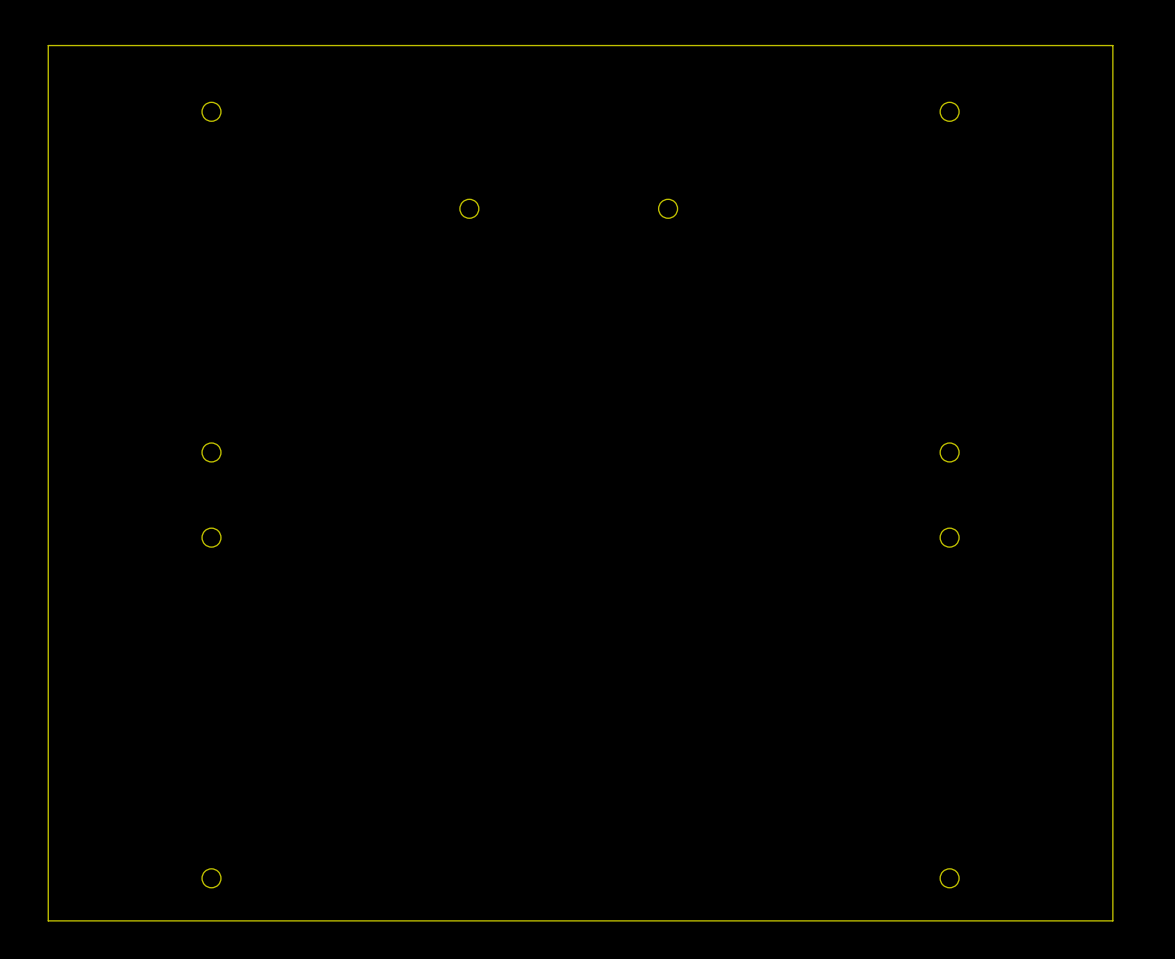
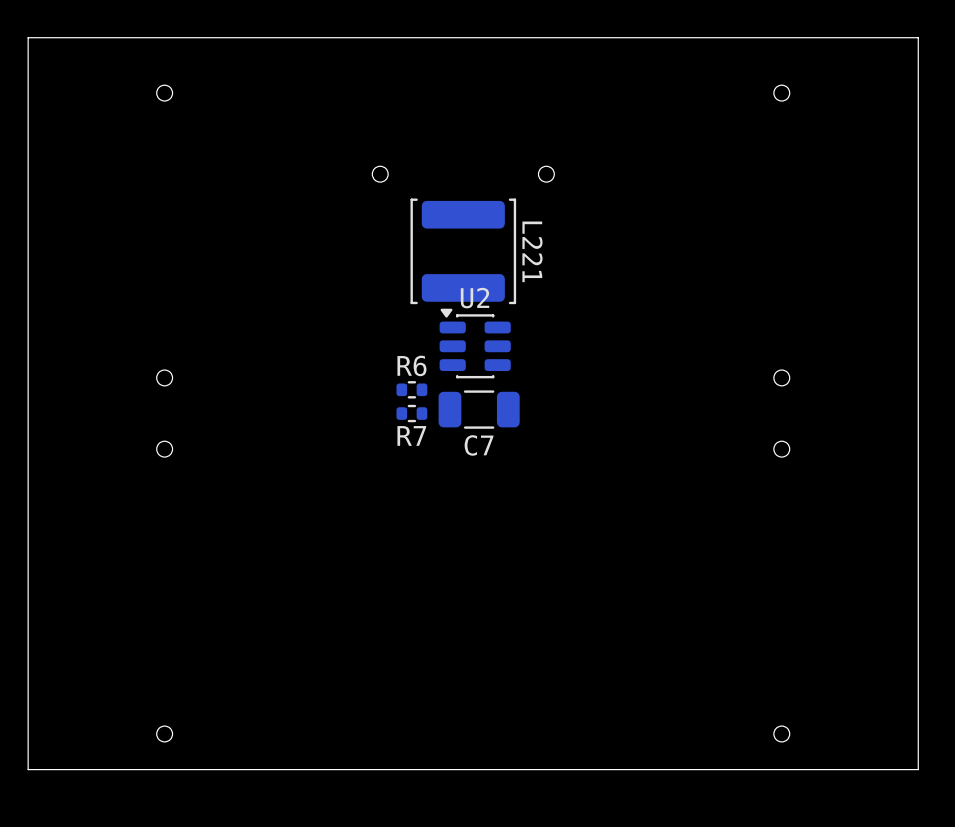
L221: none -> (463, 251)
U2: none -> (475, 343)
R6: none -> (411, 389)
C7: none -> (479, 409)
R7: none -> (411, 413)

